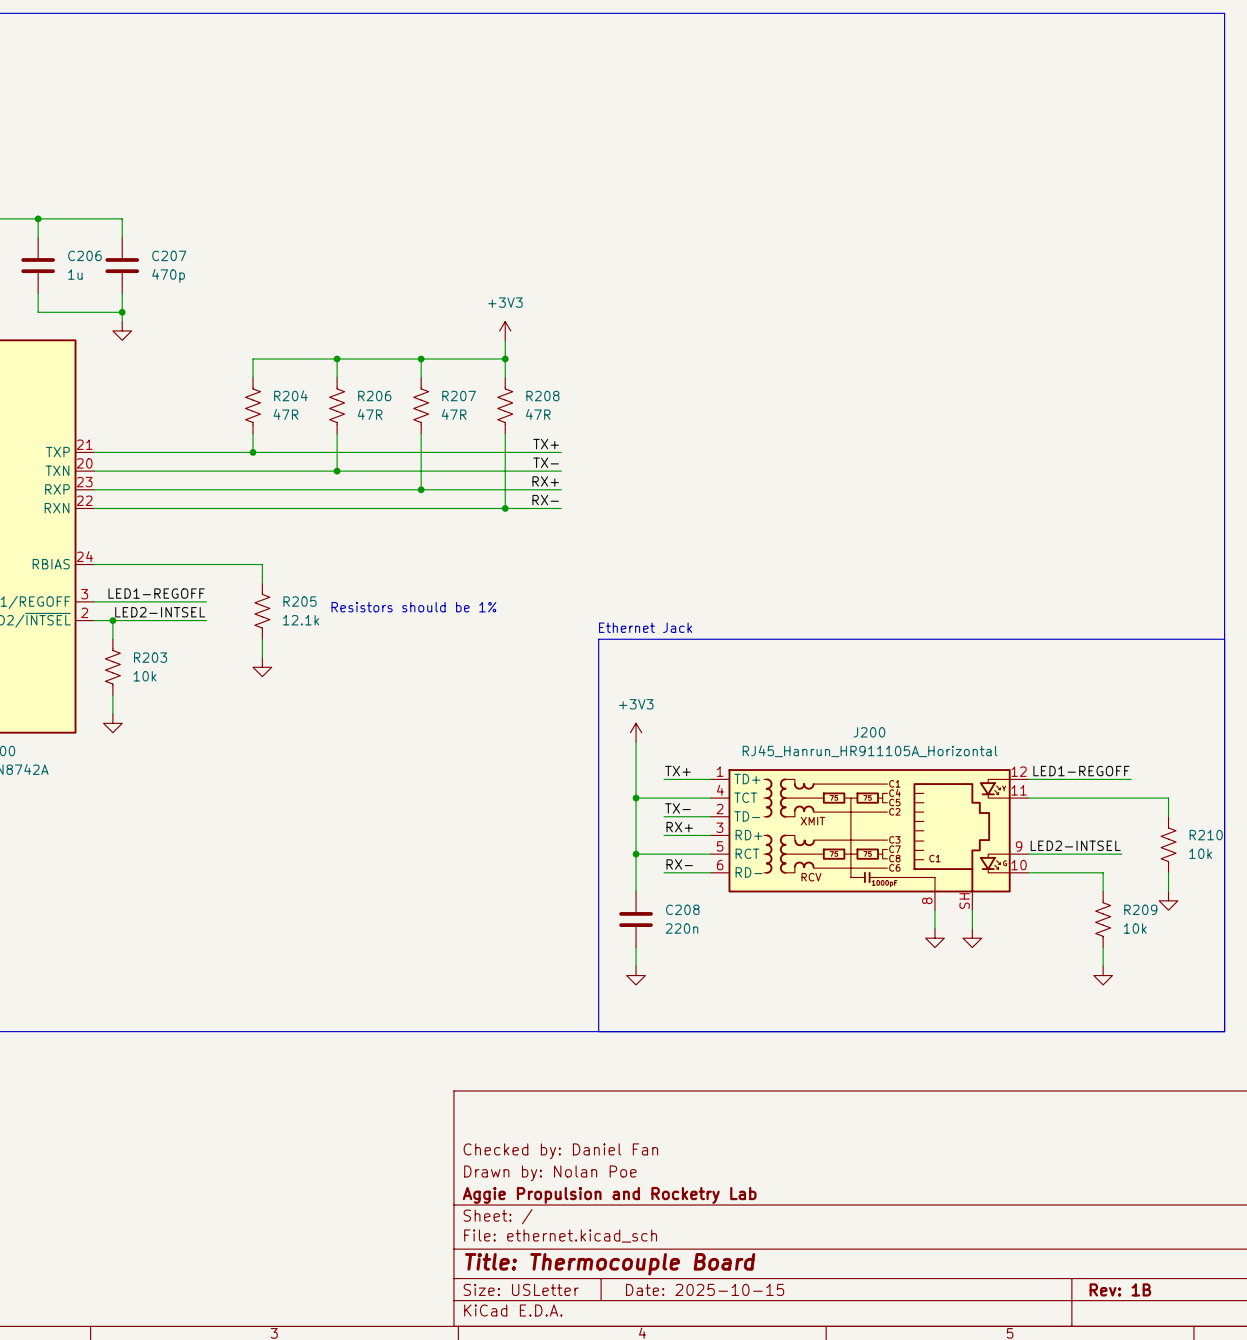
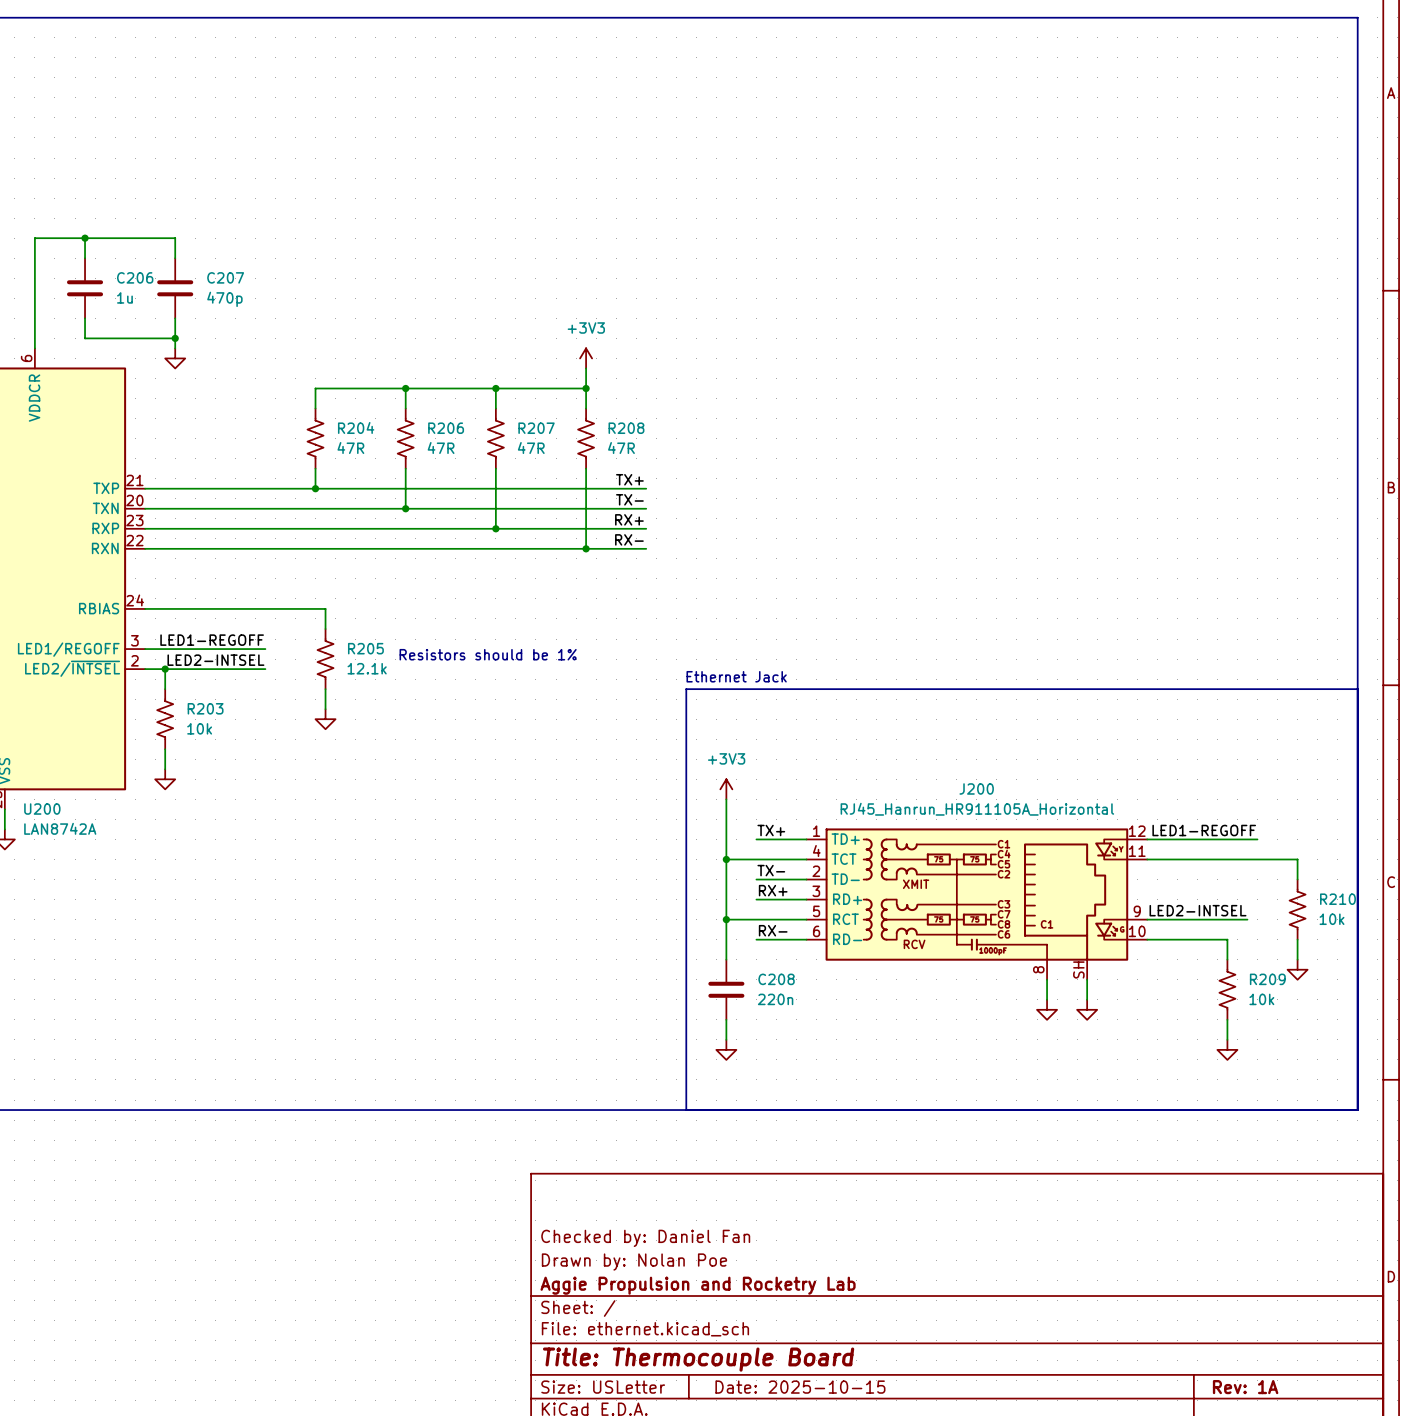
title block: Rev: 1B (1120, 1289) -> Rev: 1A (1245, 1387)

